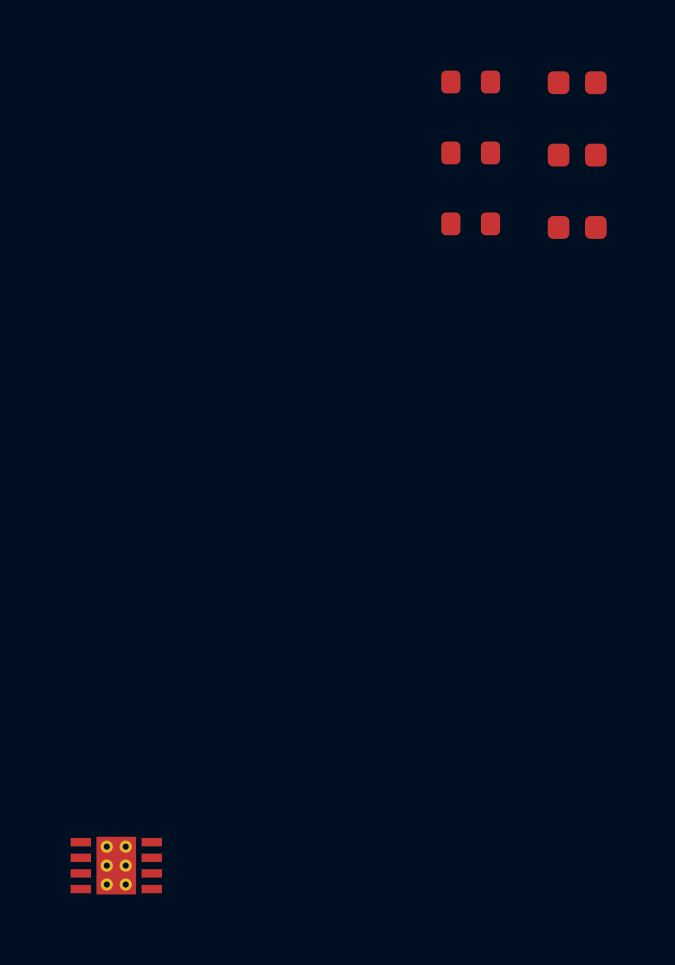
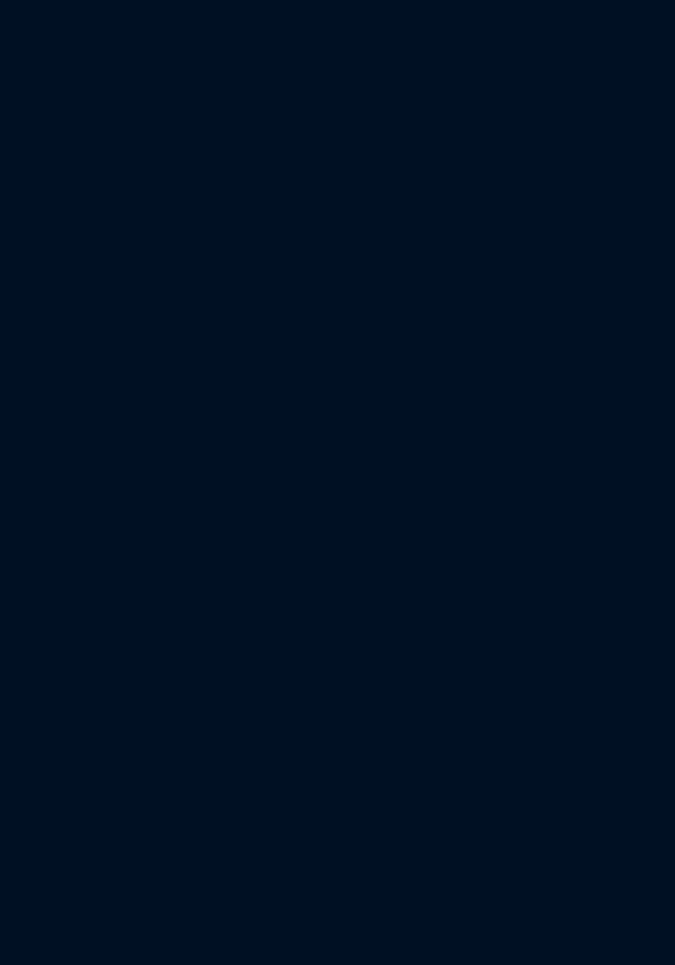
part: (470, 81) -> none
part: (577, 82) -> none
part: (470, 152) -> none
part: (577, 155) -> none
part: (470, 223) -> none
part: (577, 227) -> none
part: (116, 865) -> none

